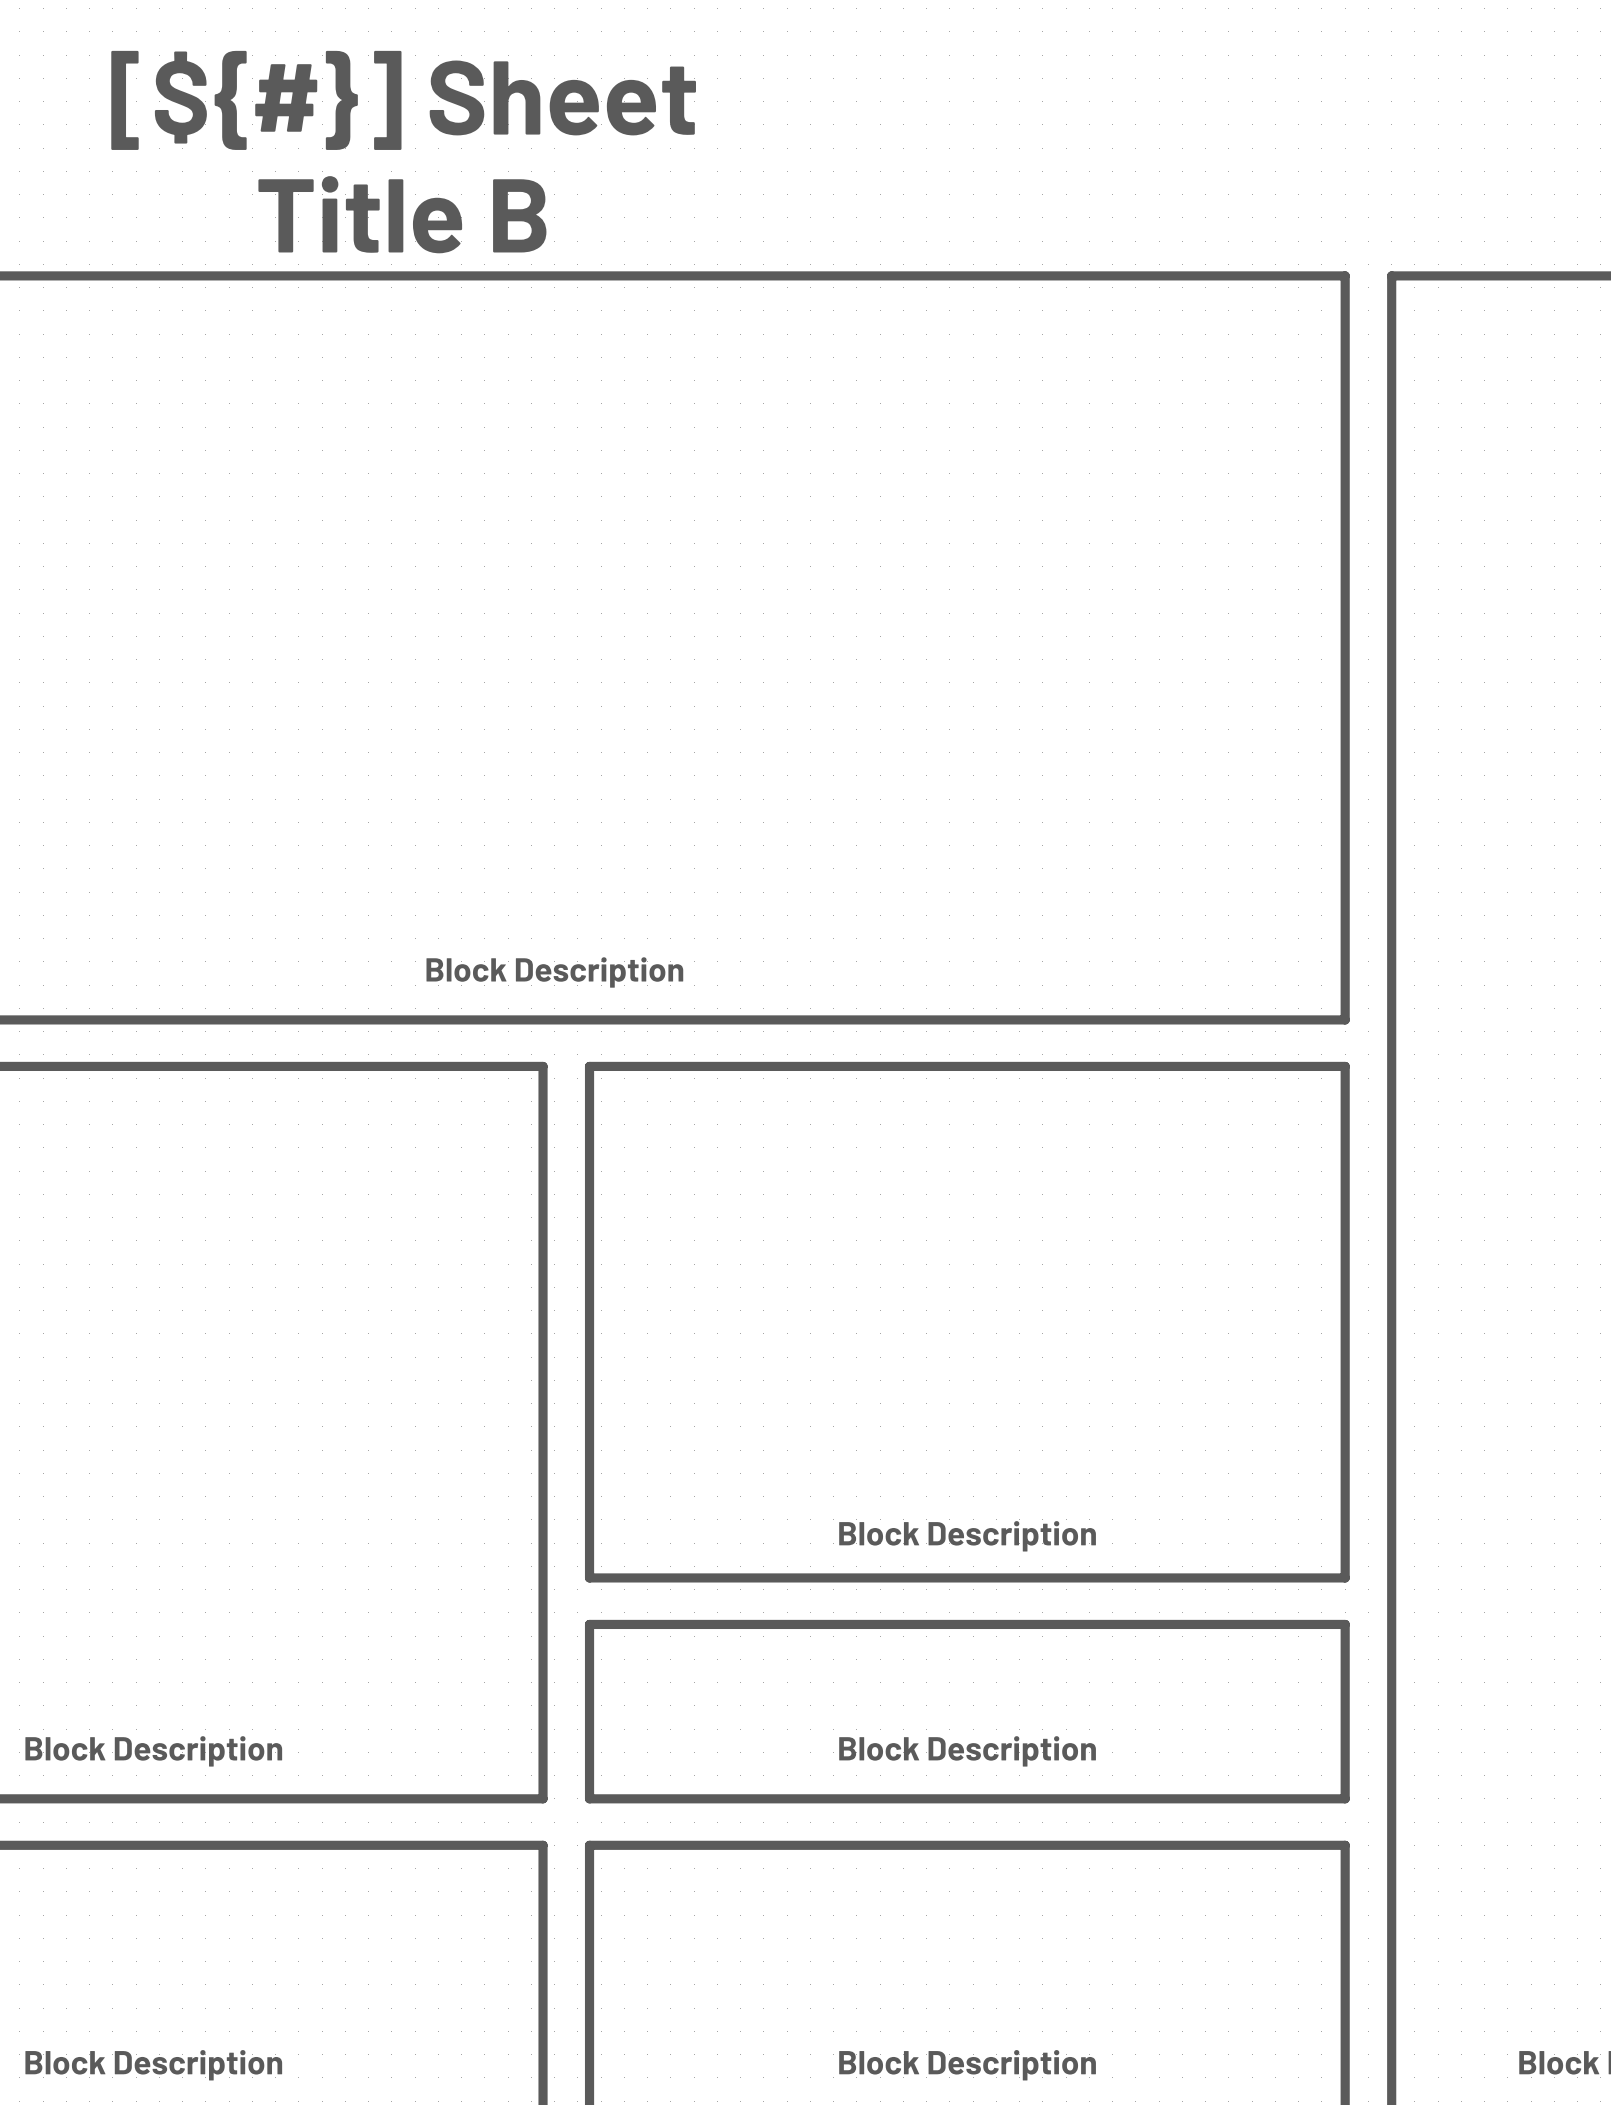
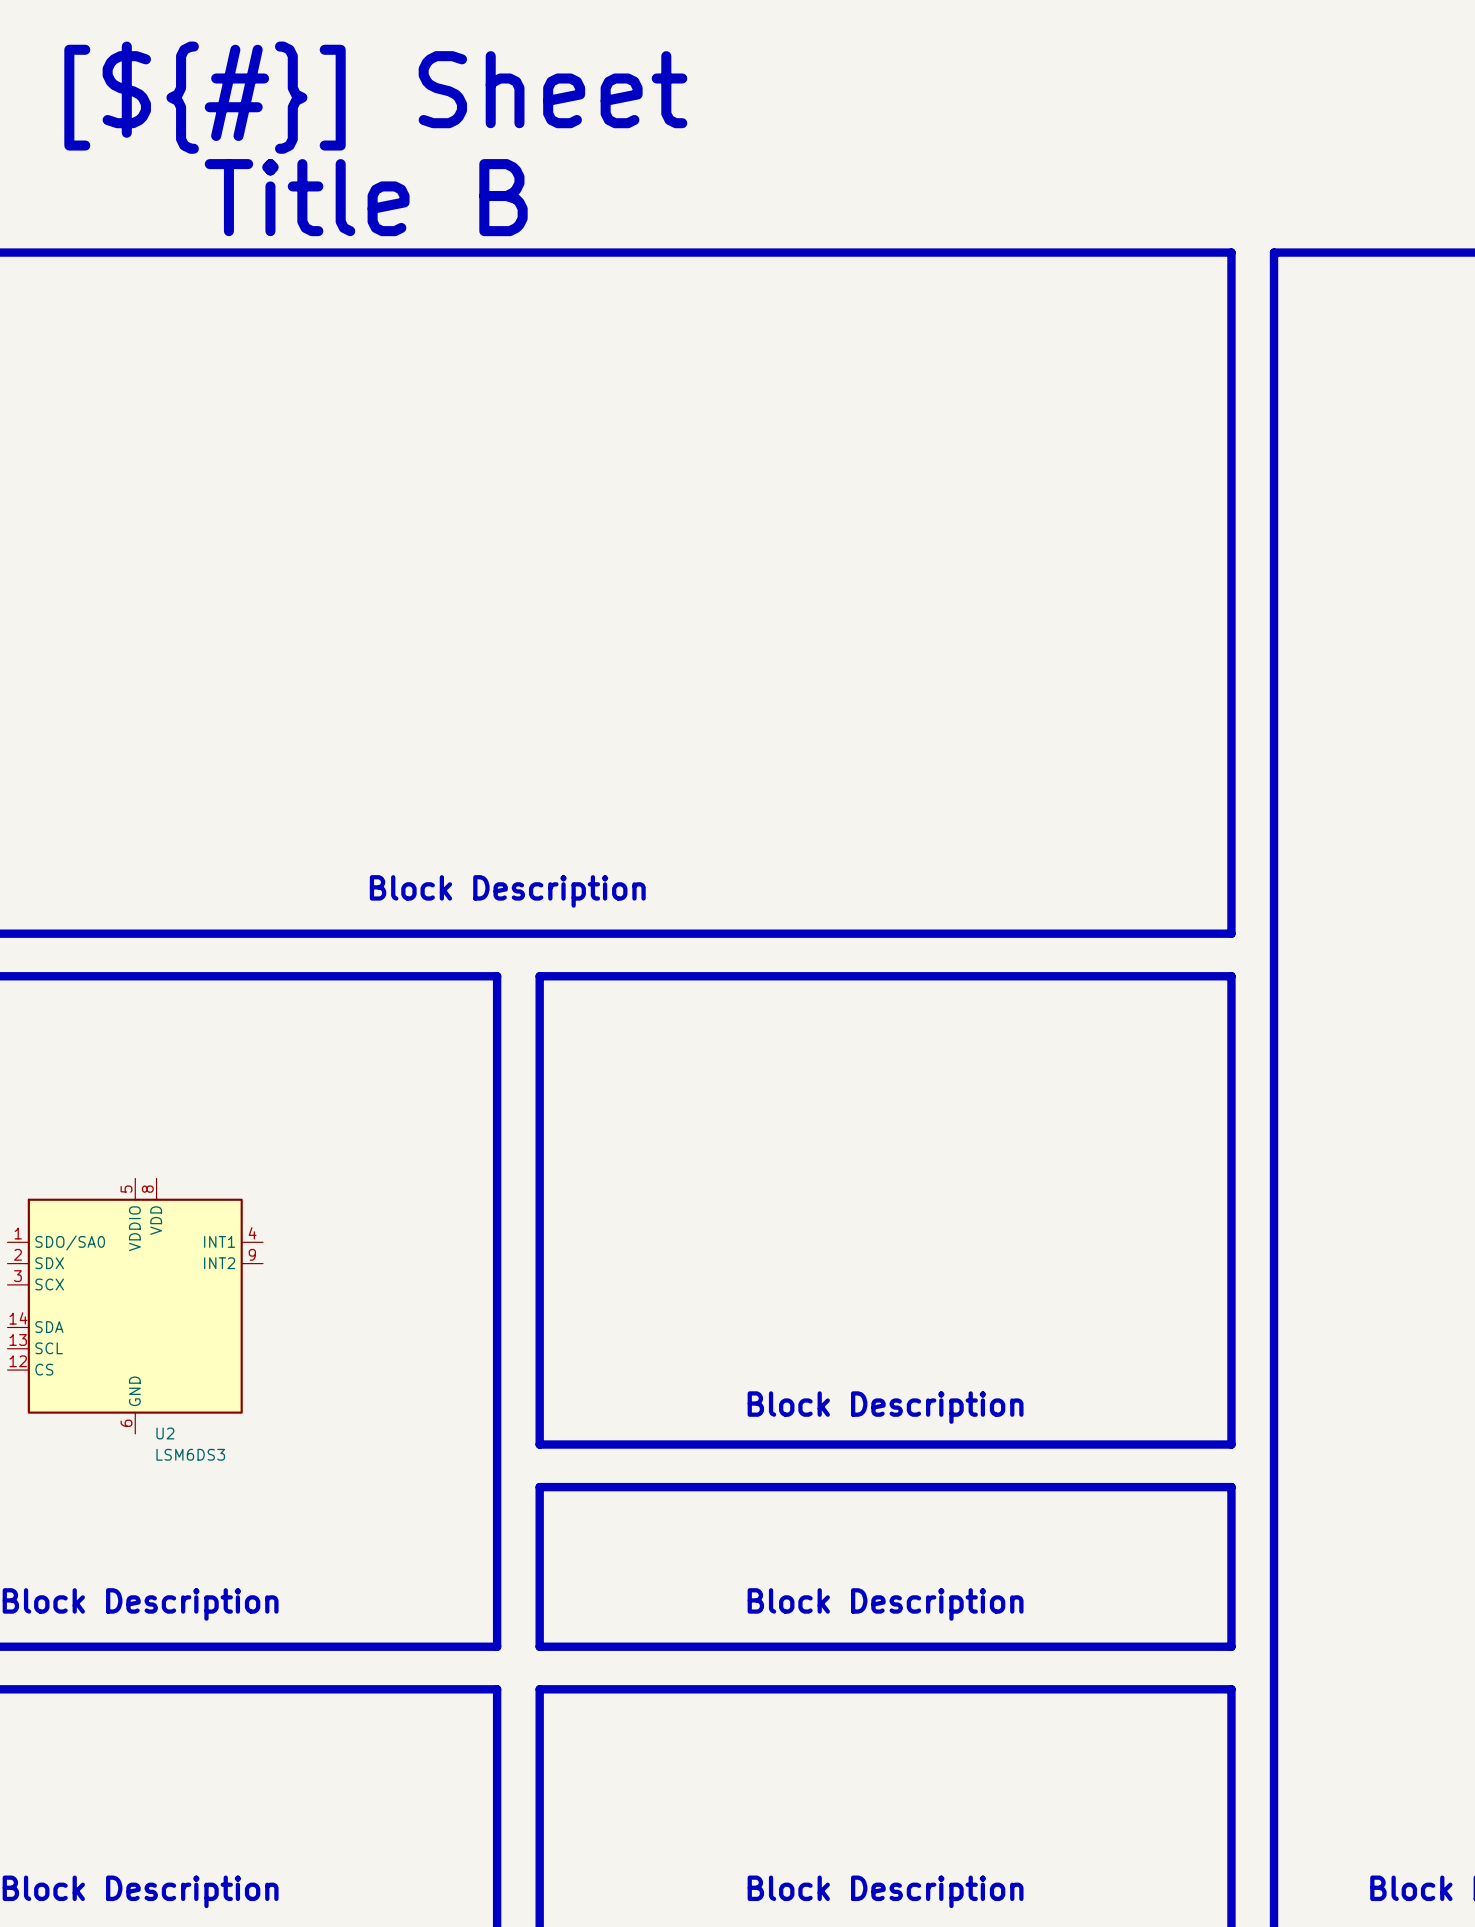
U2: none -> LSM6DS3 (135, 1306)

